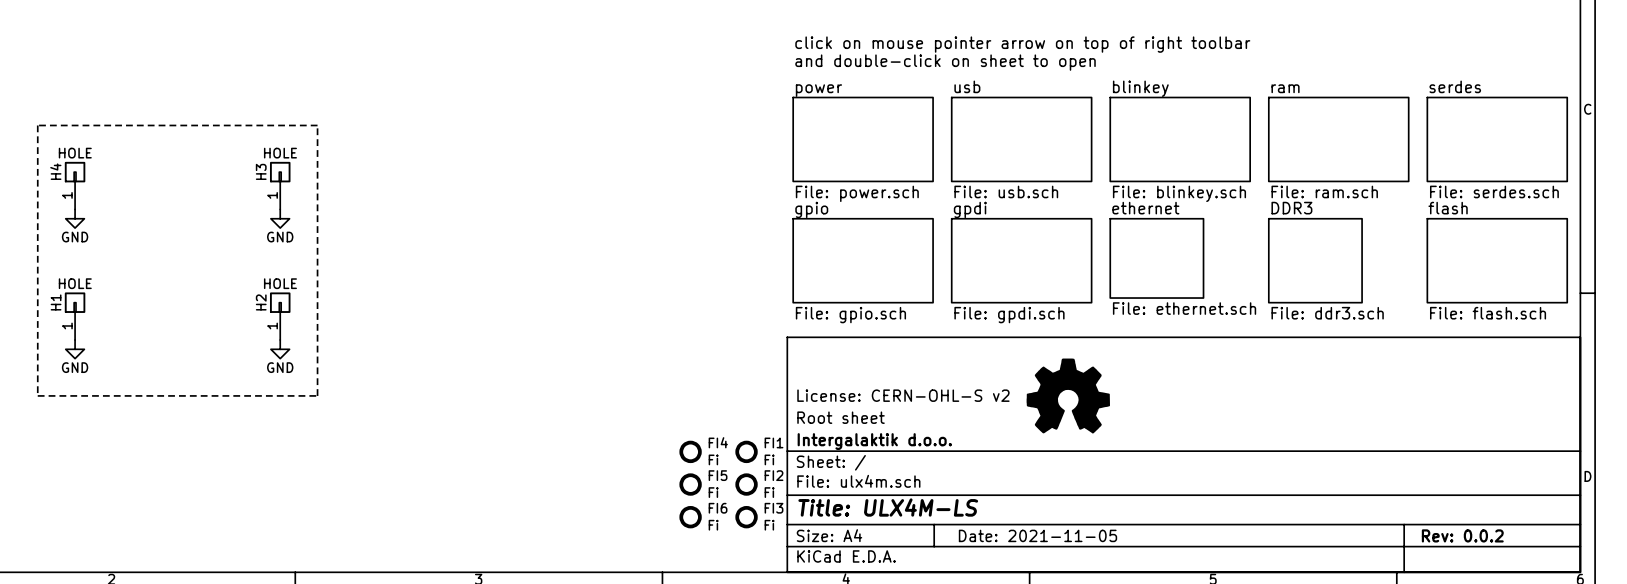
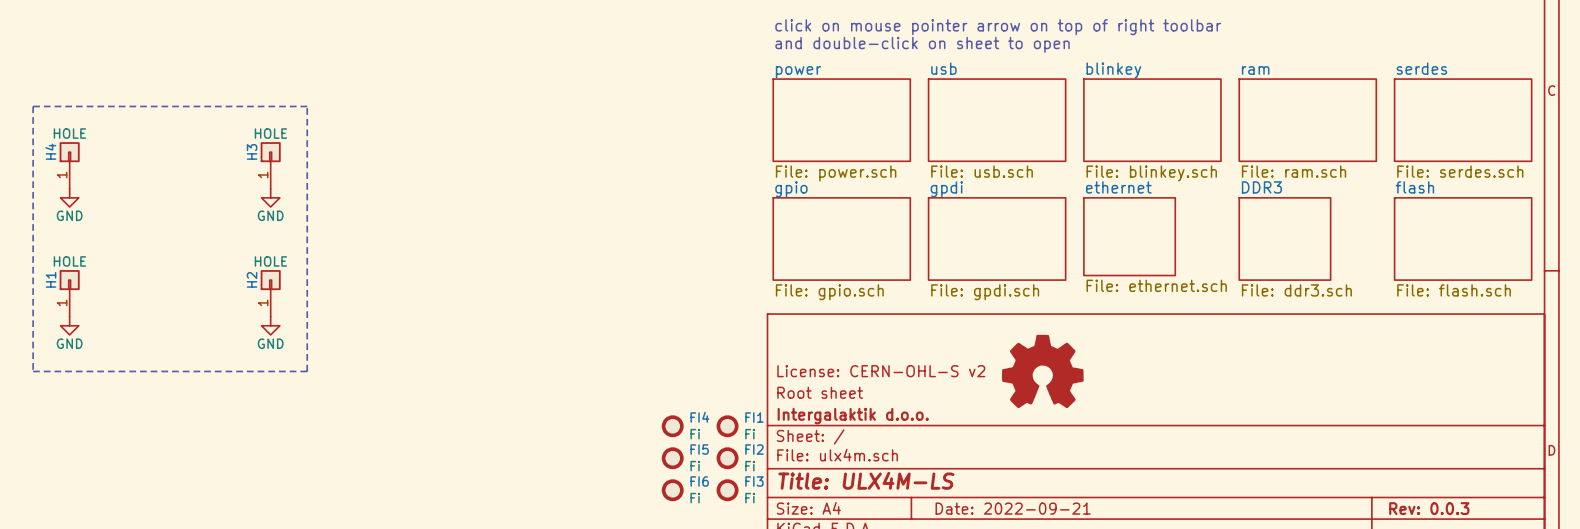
title block: Date: 2021-11-05 (1037, 535) -> Date: 2022-09-21 (1013, 508)
title block: Rev: 0.0.2 (1462, 535) -> Rev: 0.0.3 (1429, 508)

